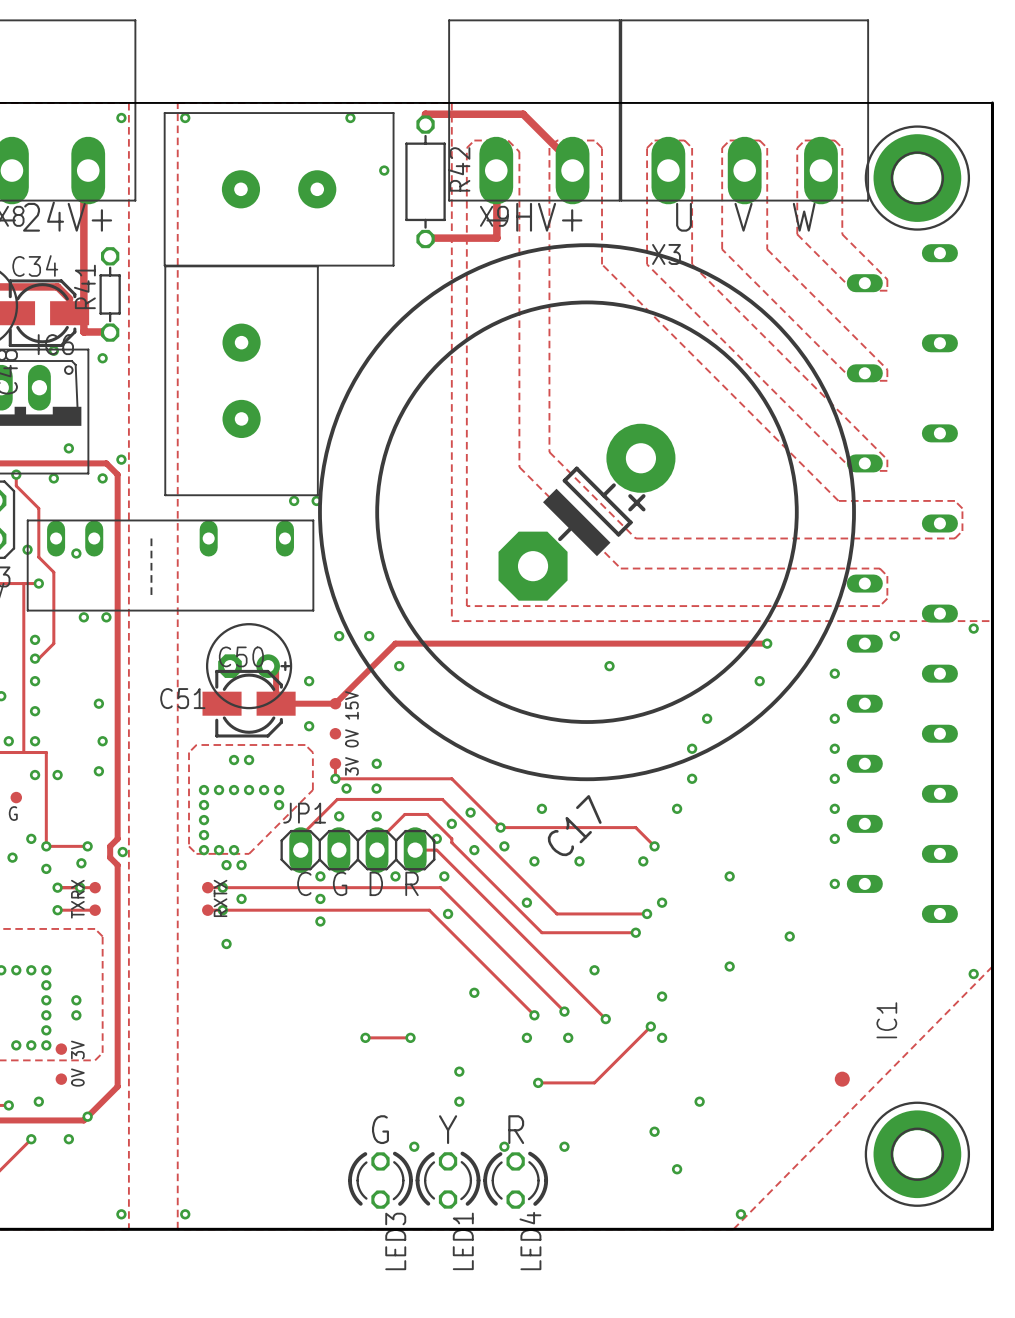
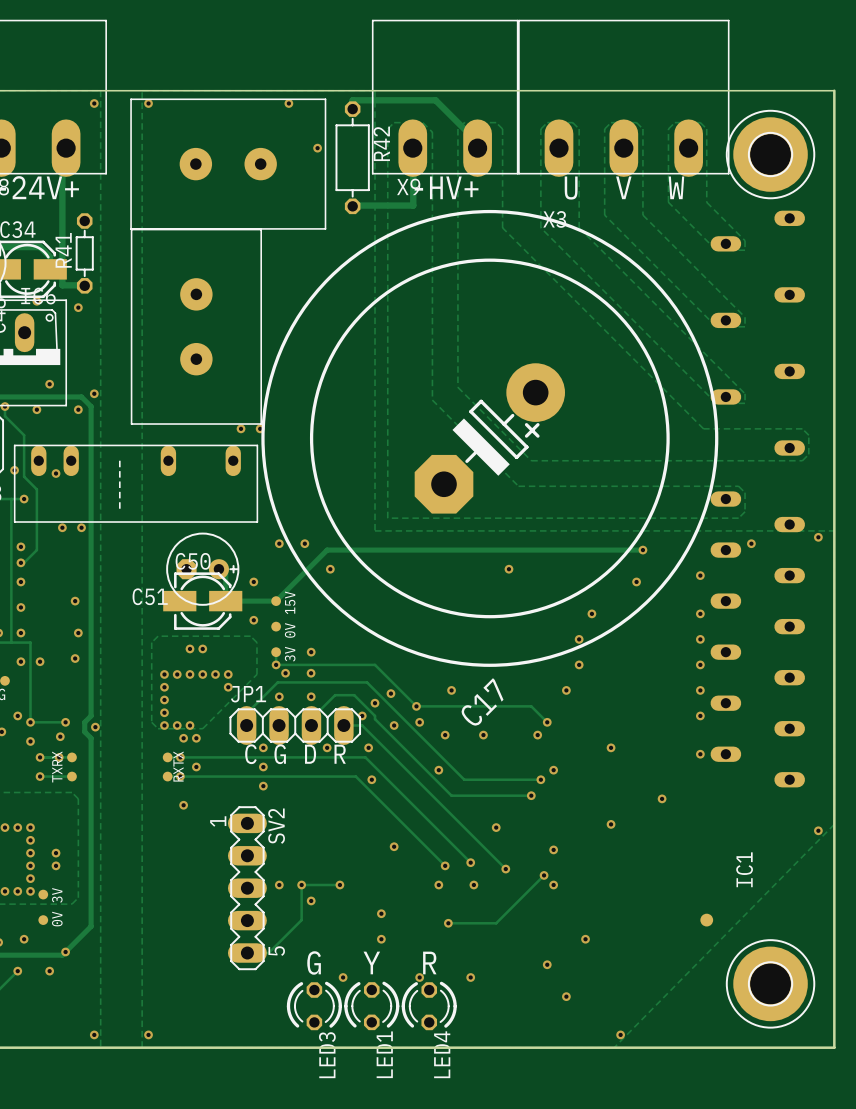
via: none -> (279, 885)
track: none -> (301, 885) (301, 920) (268, 953) (247, 953)
SV2: none -> (247, 888)
via: none -> (311, 900)

